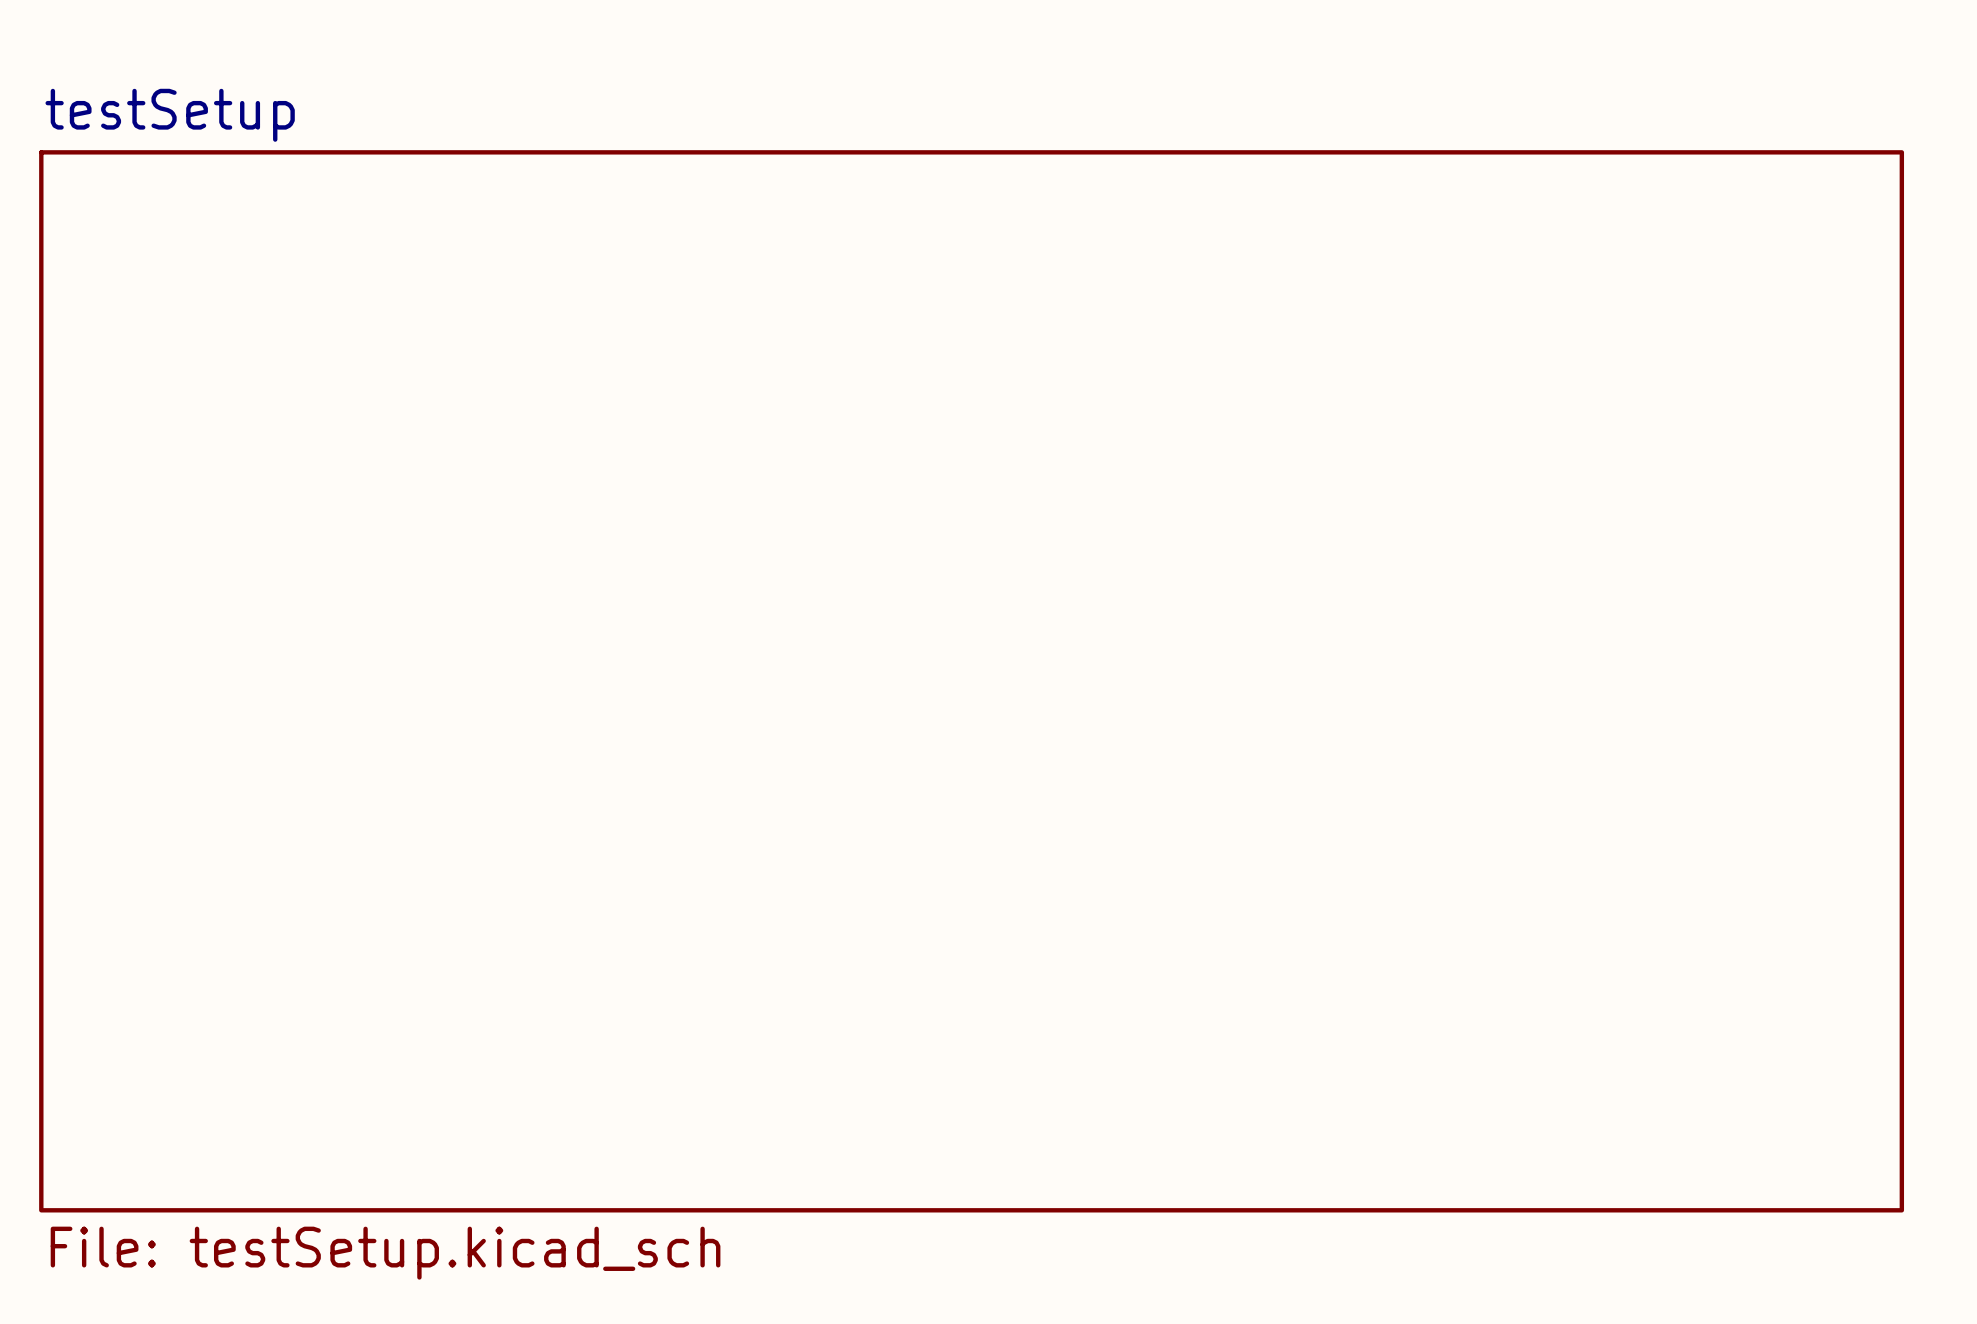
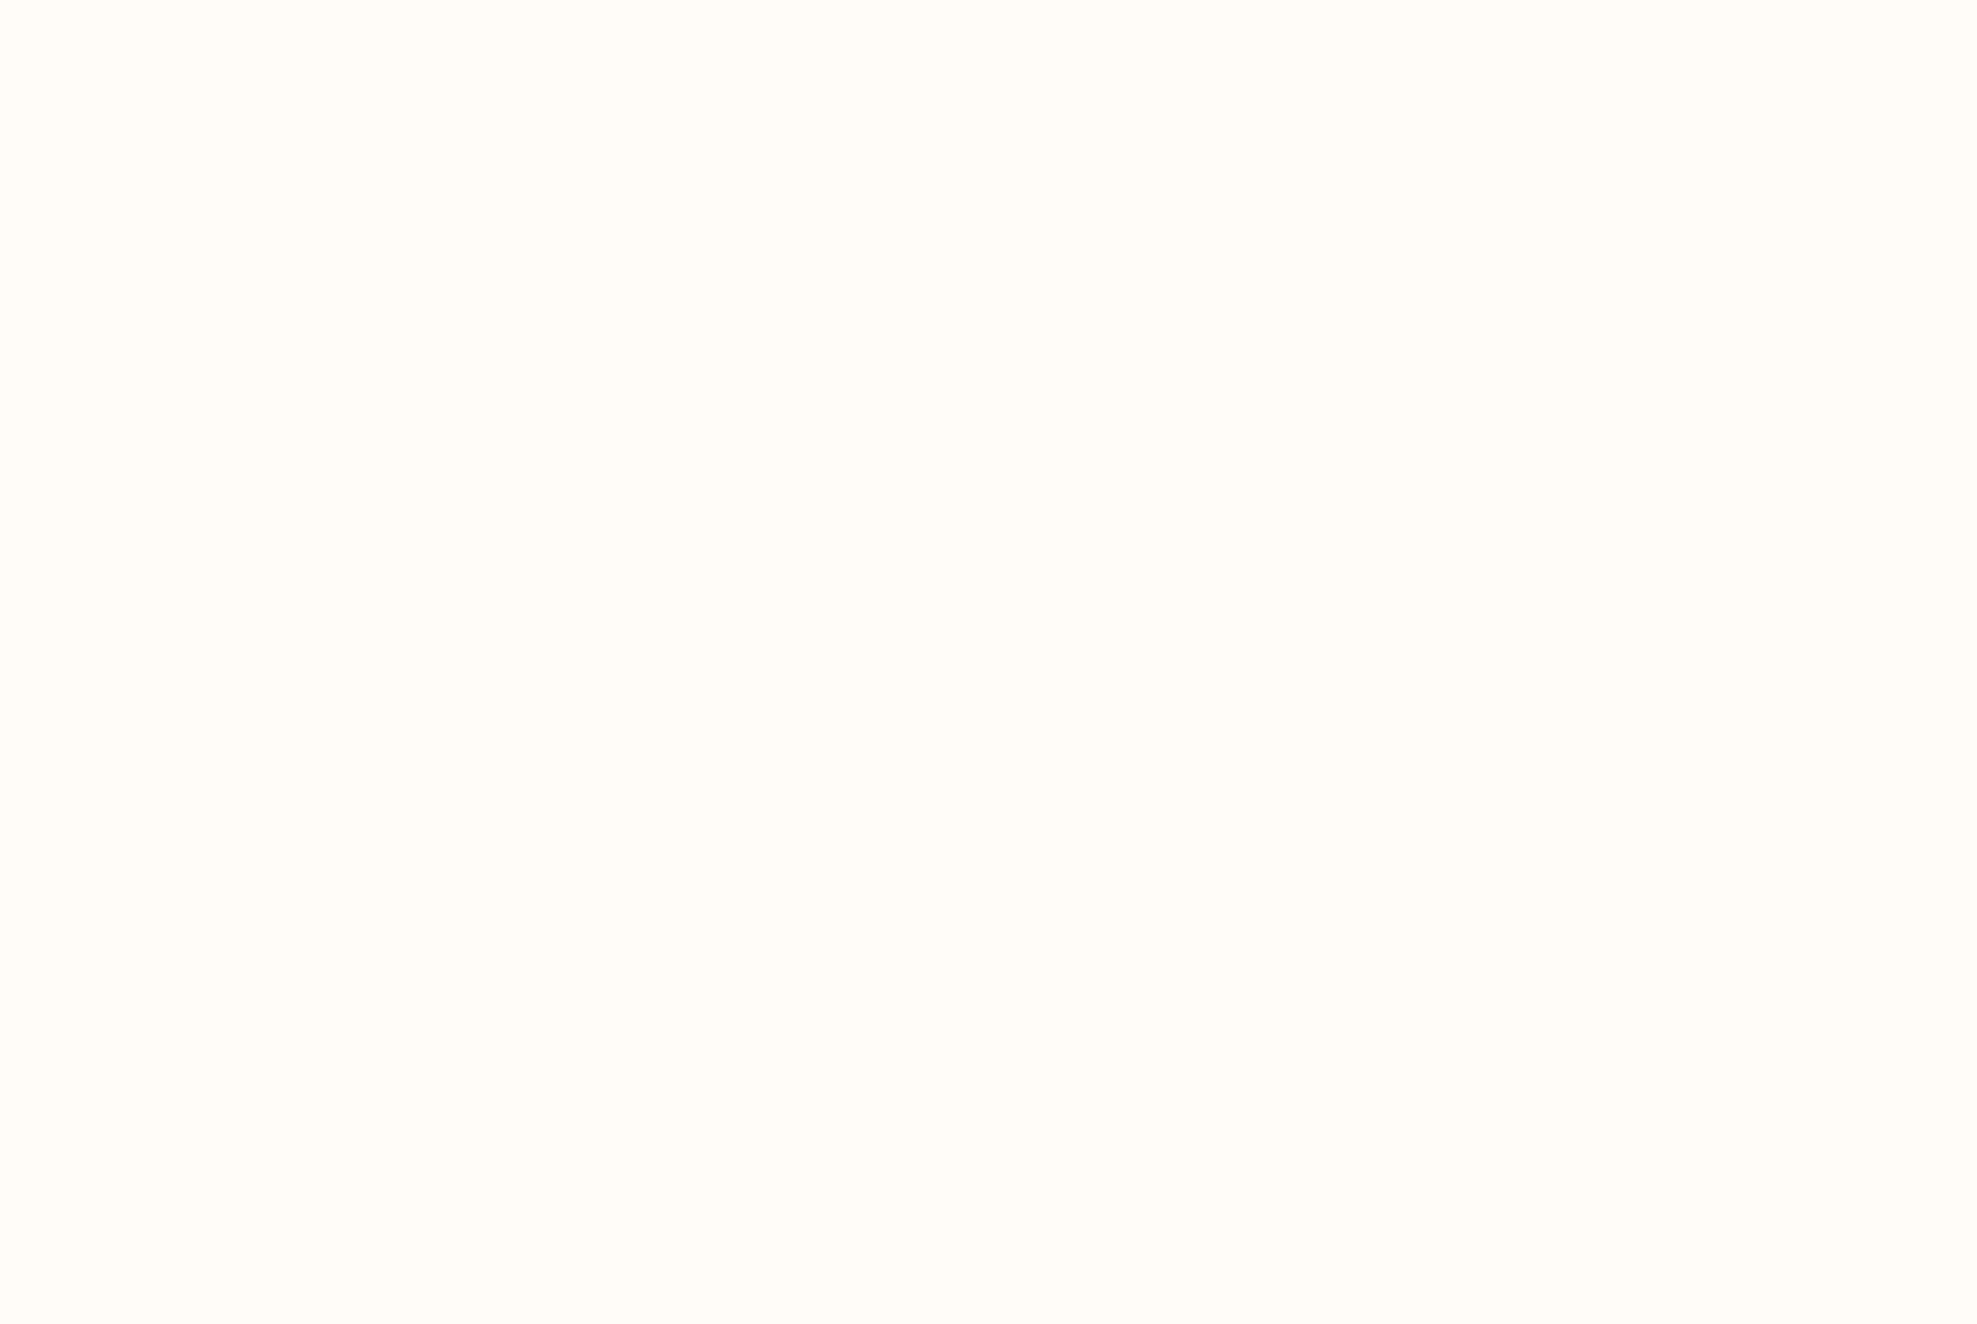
sheet testSetup: File: testSetup.kicad_sch (971, 681) -> none

